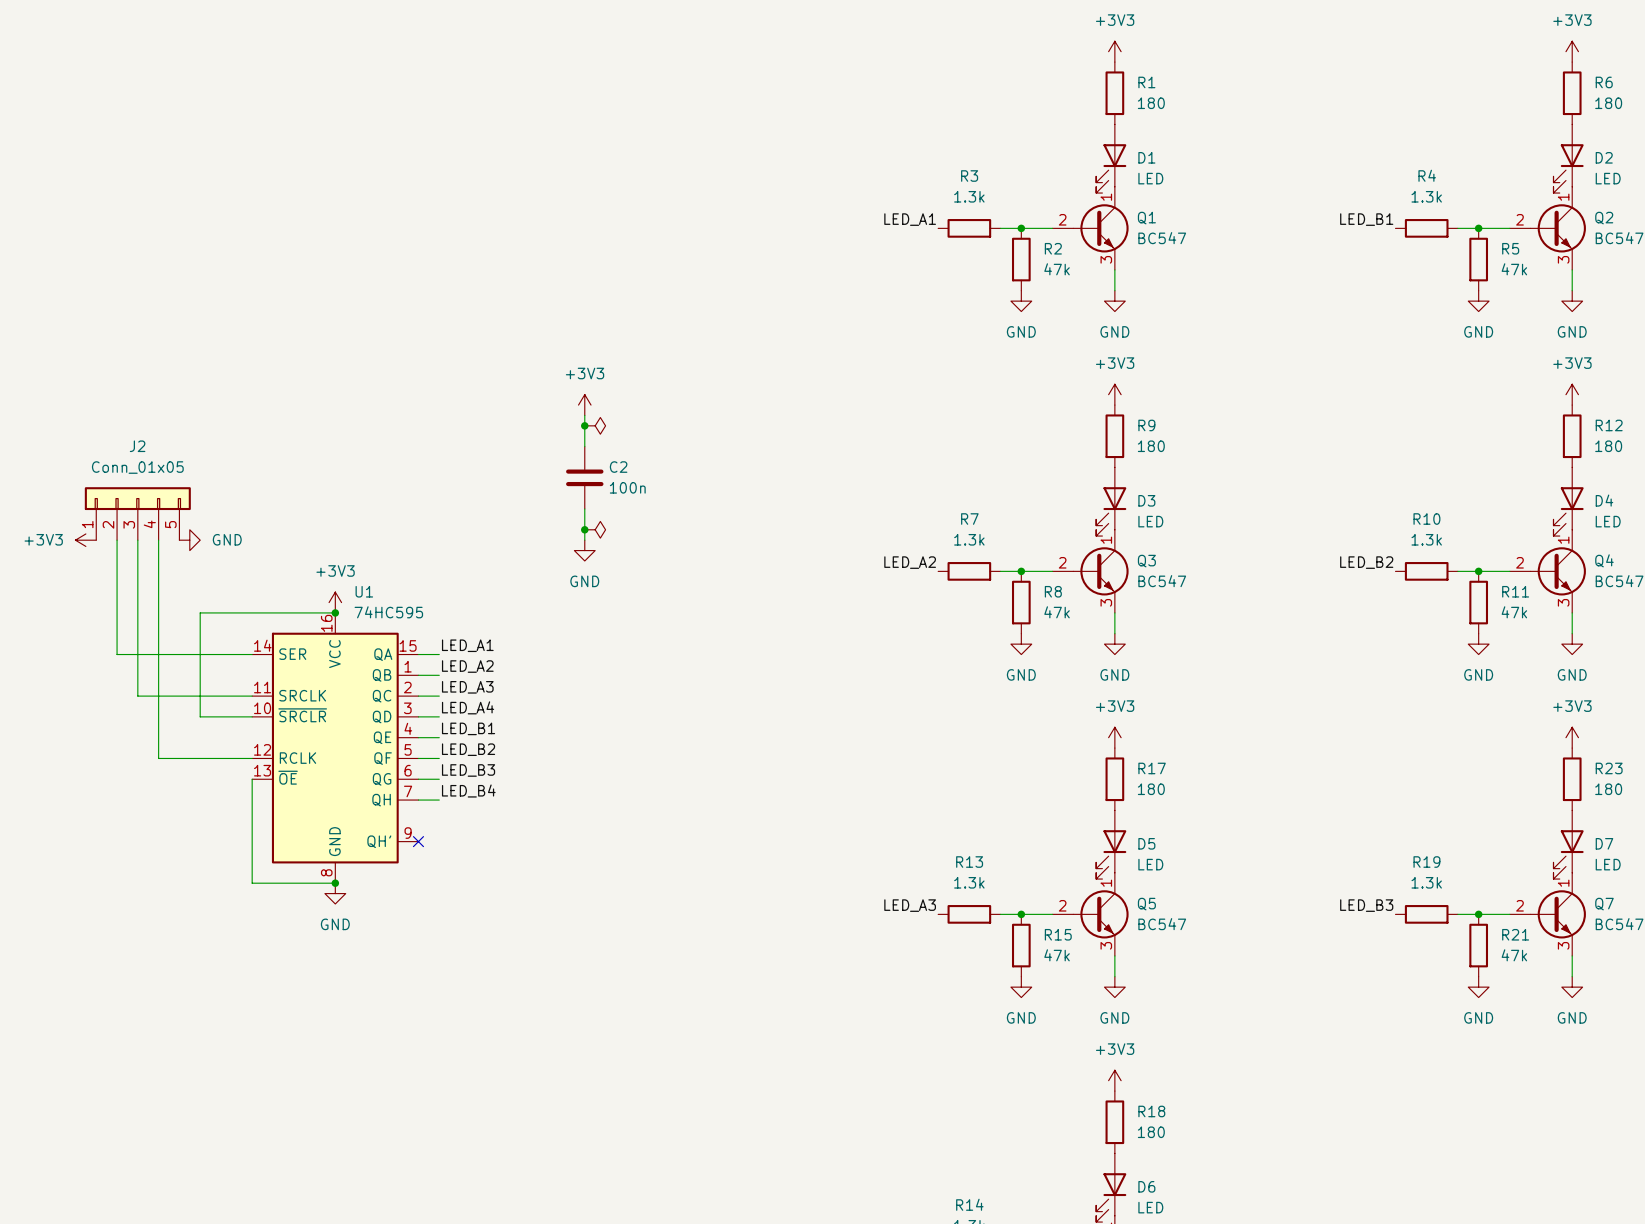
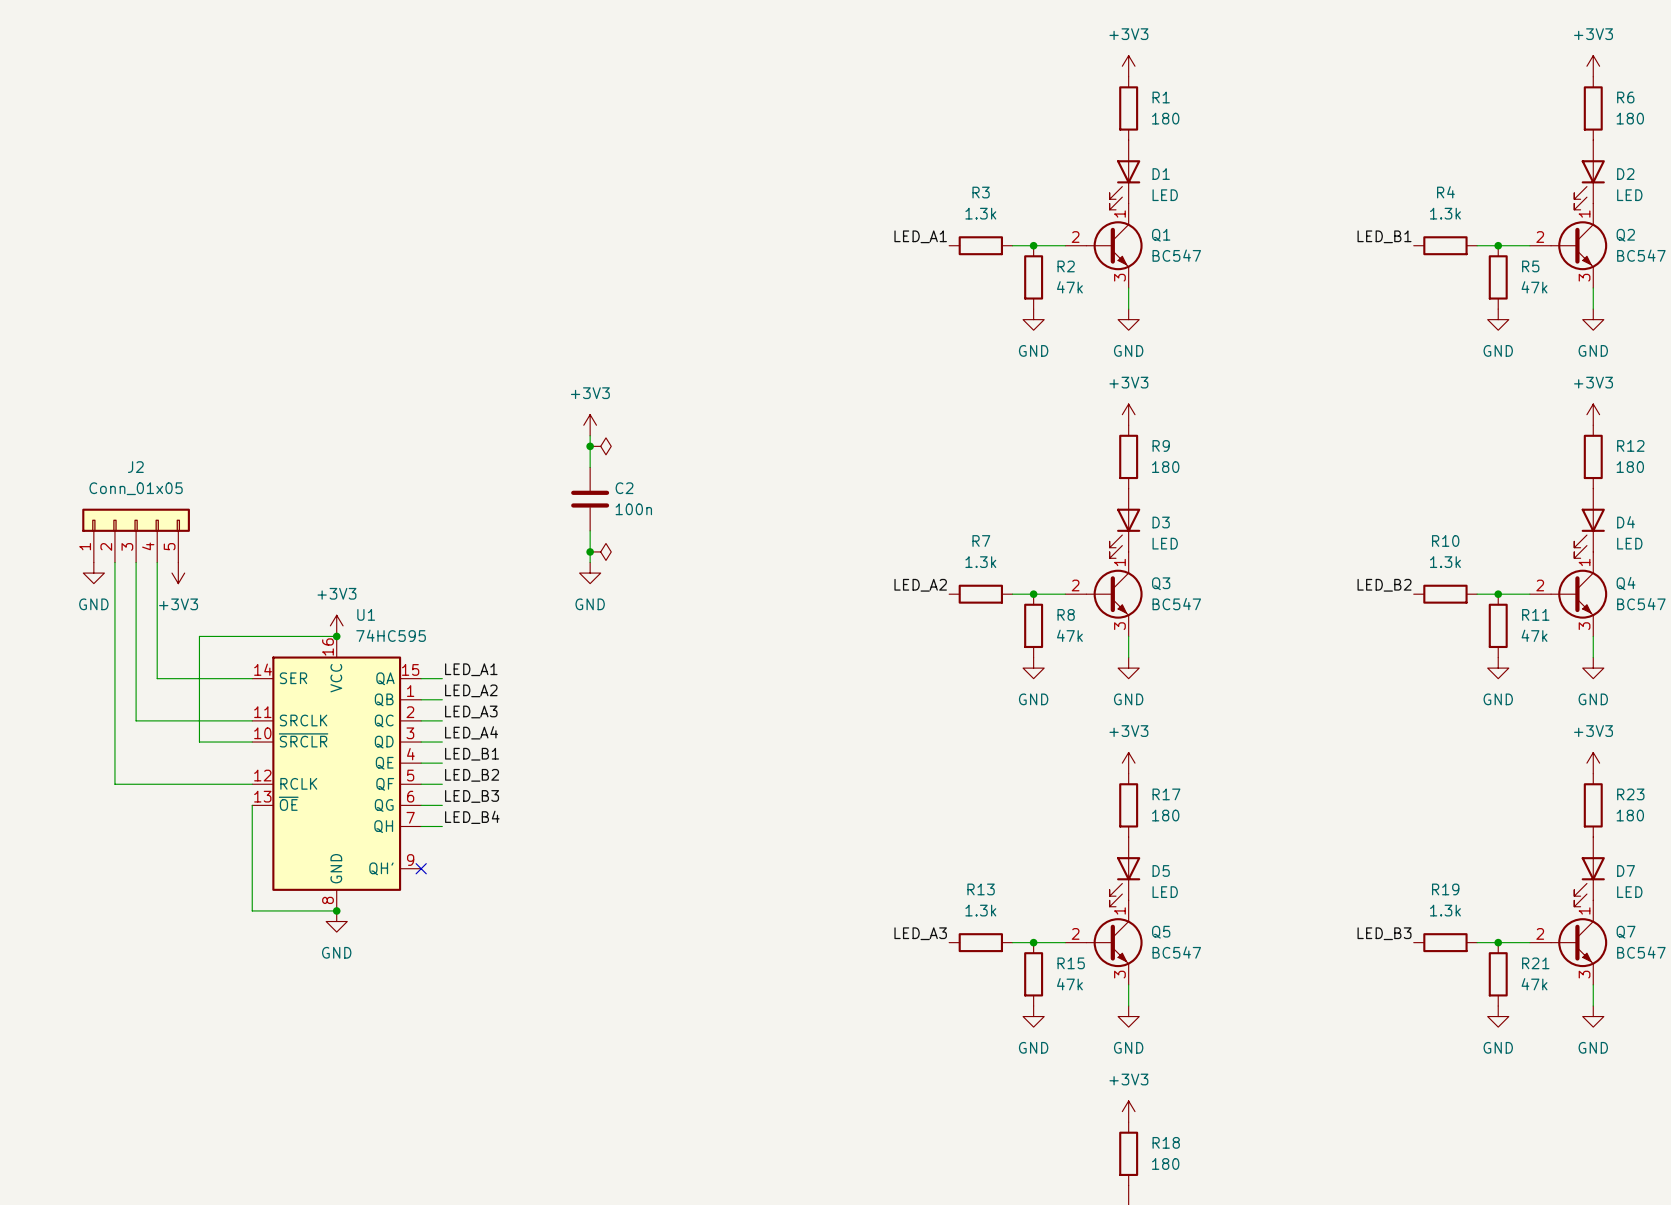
power symbol rotation: 0° (85, 540) -> 90° counterclockwise (178, 573)
power symbol position: +3V3 (85, 540) -> +3V3 (178, 573)
power symbol rotation: 0° (189, 540) -> 90° clockwise (93, 573)
power symbol position: GND (189, 540) -> GND (93, 573)
wire: (117, 654) (158, 654) (158, 758) -> (114, 678) (114, 784) (157, 784)

